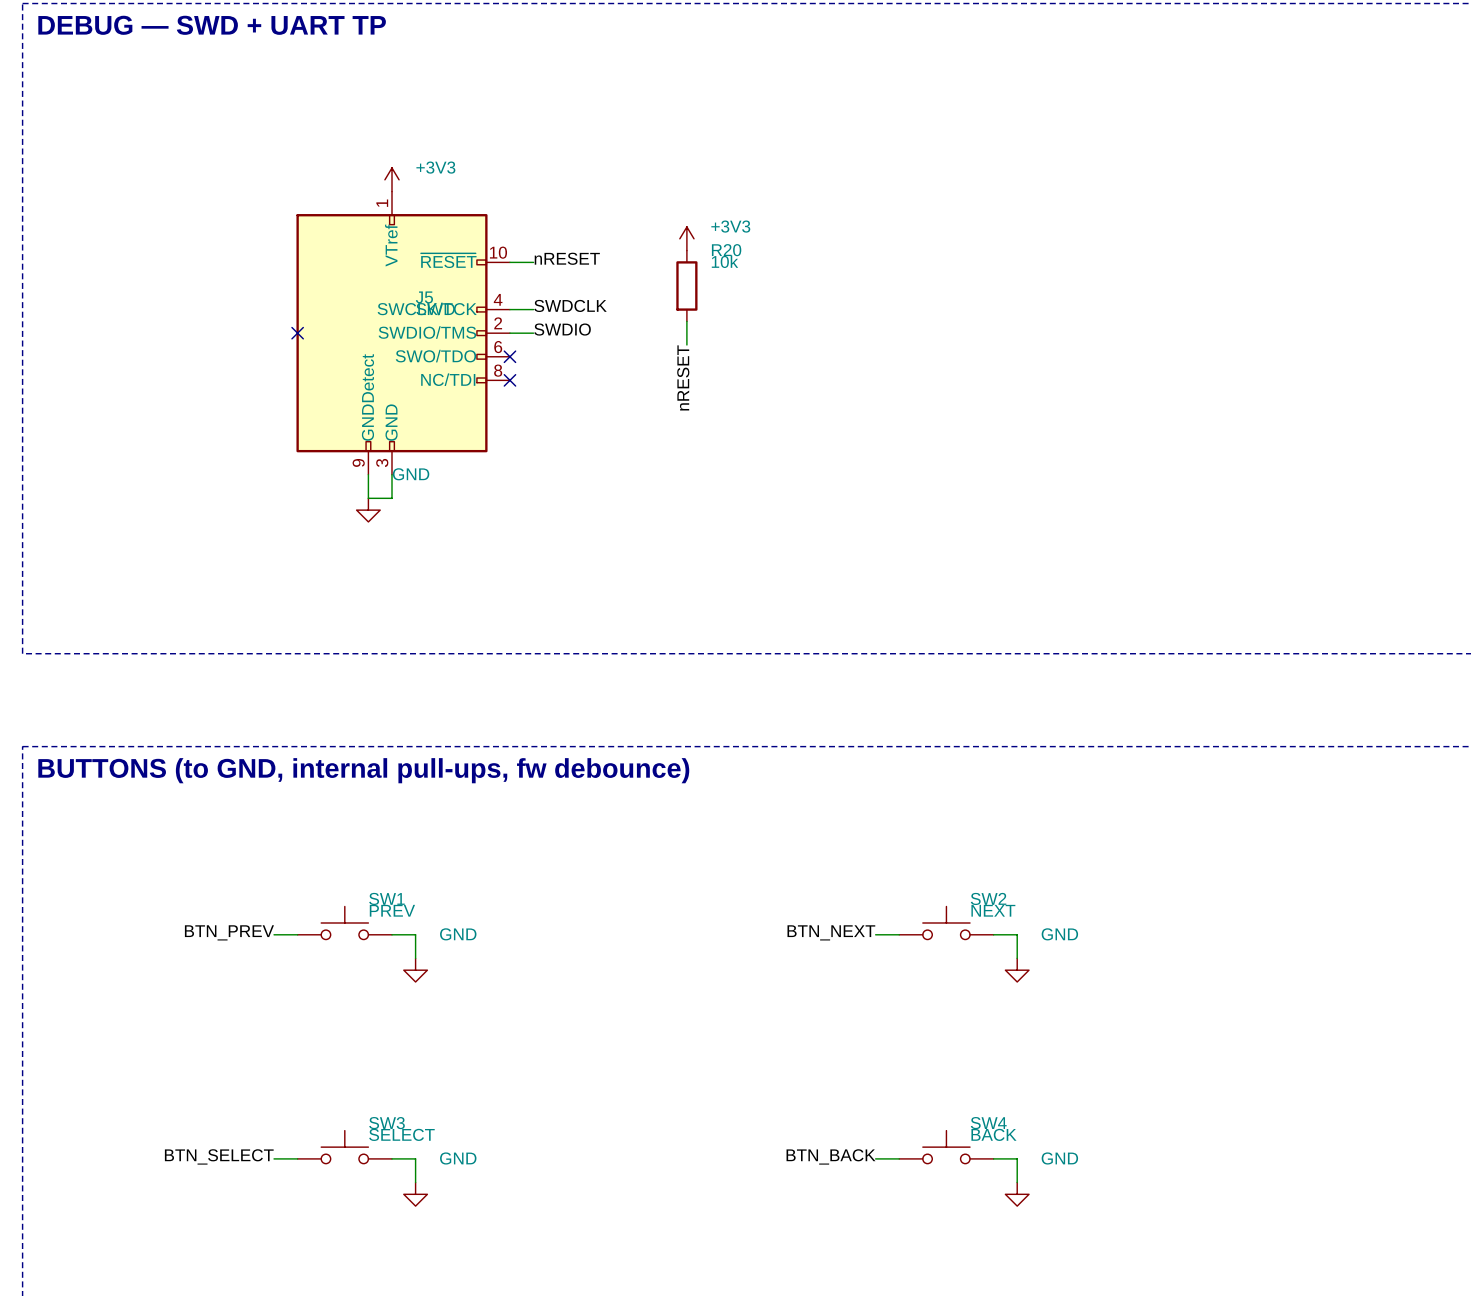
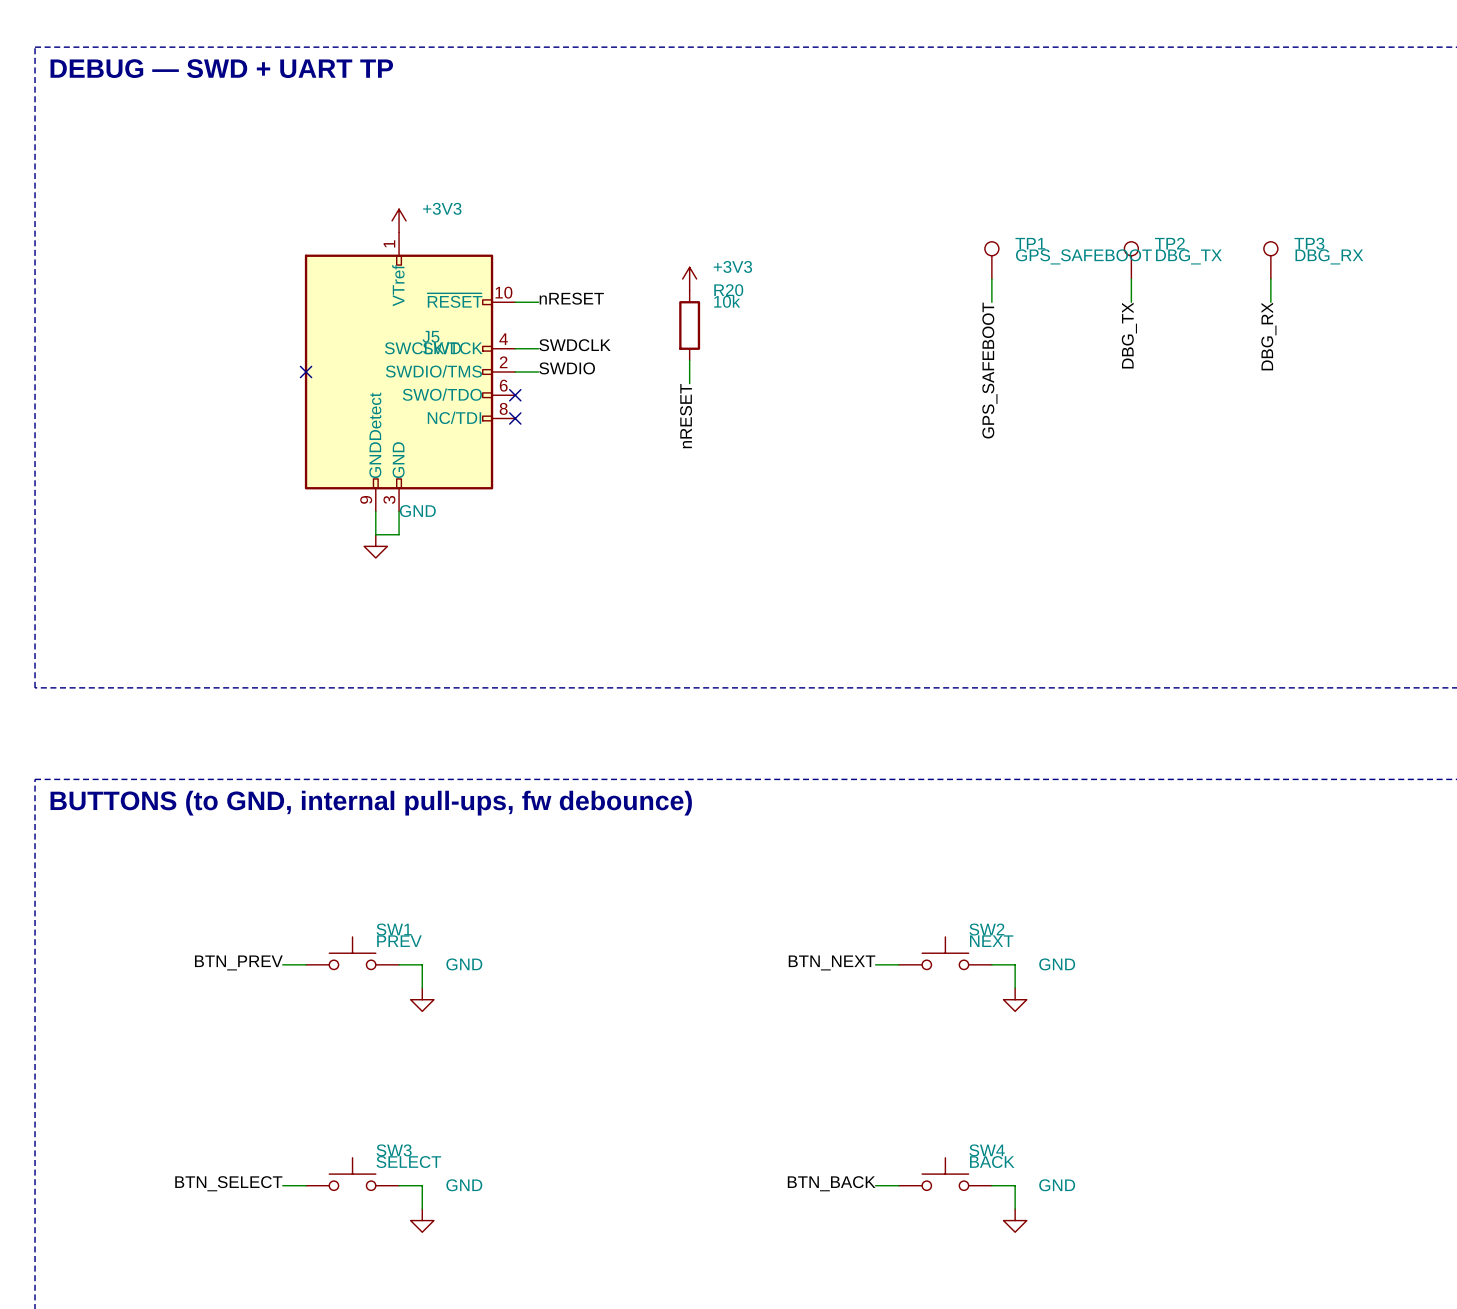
TP1: none -> GPS_SAFEBOOT (991, 260)
TP2: none -> DBG_TX (1131, 260)
TP3: none -> DBG_RX (1270, 260)
wire: none -> (991, 279) (991, 302)
wire: none -> (1131, 279) (1131, 302)
wire: none -> (1270, 279) (1270, 302)
label: none -> DBG_TX (1129, 335)
label: none -> DBG_RX (1268, 336)
label: none -> GPS_SAFEBOOT (989, 370)

